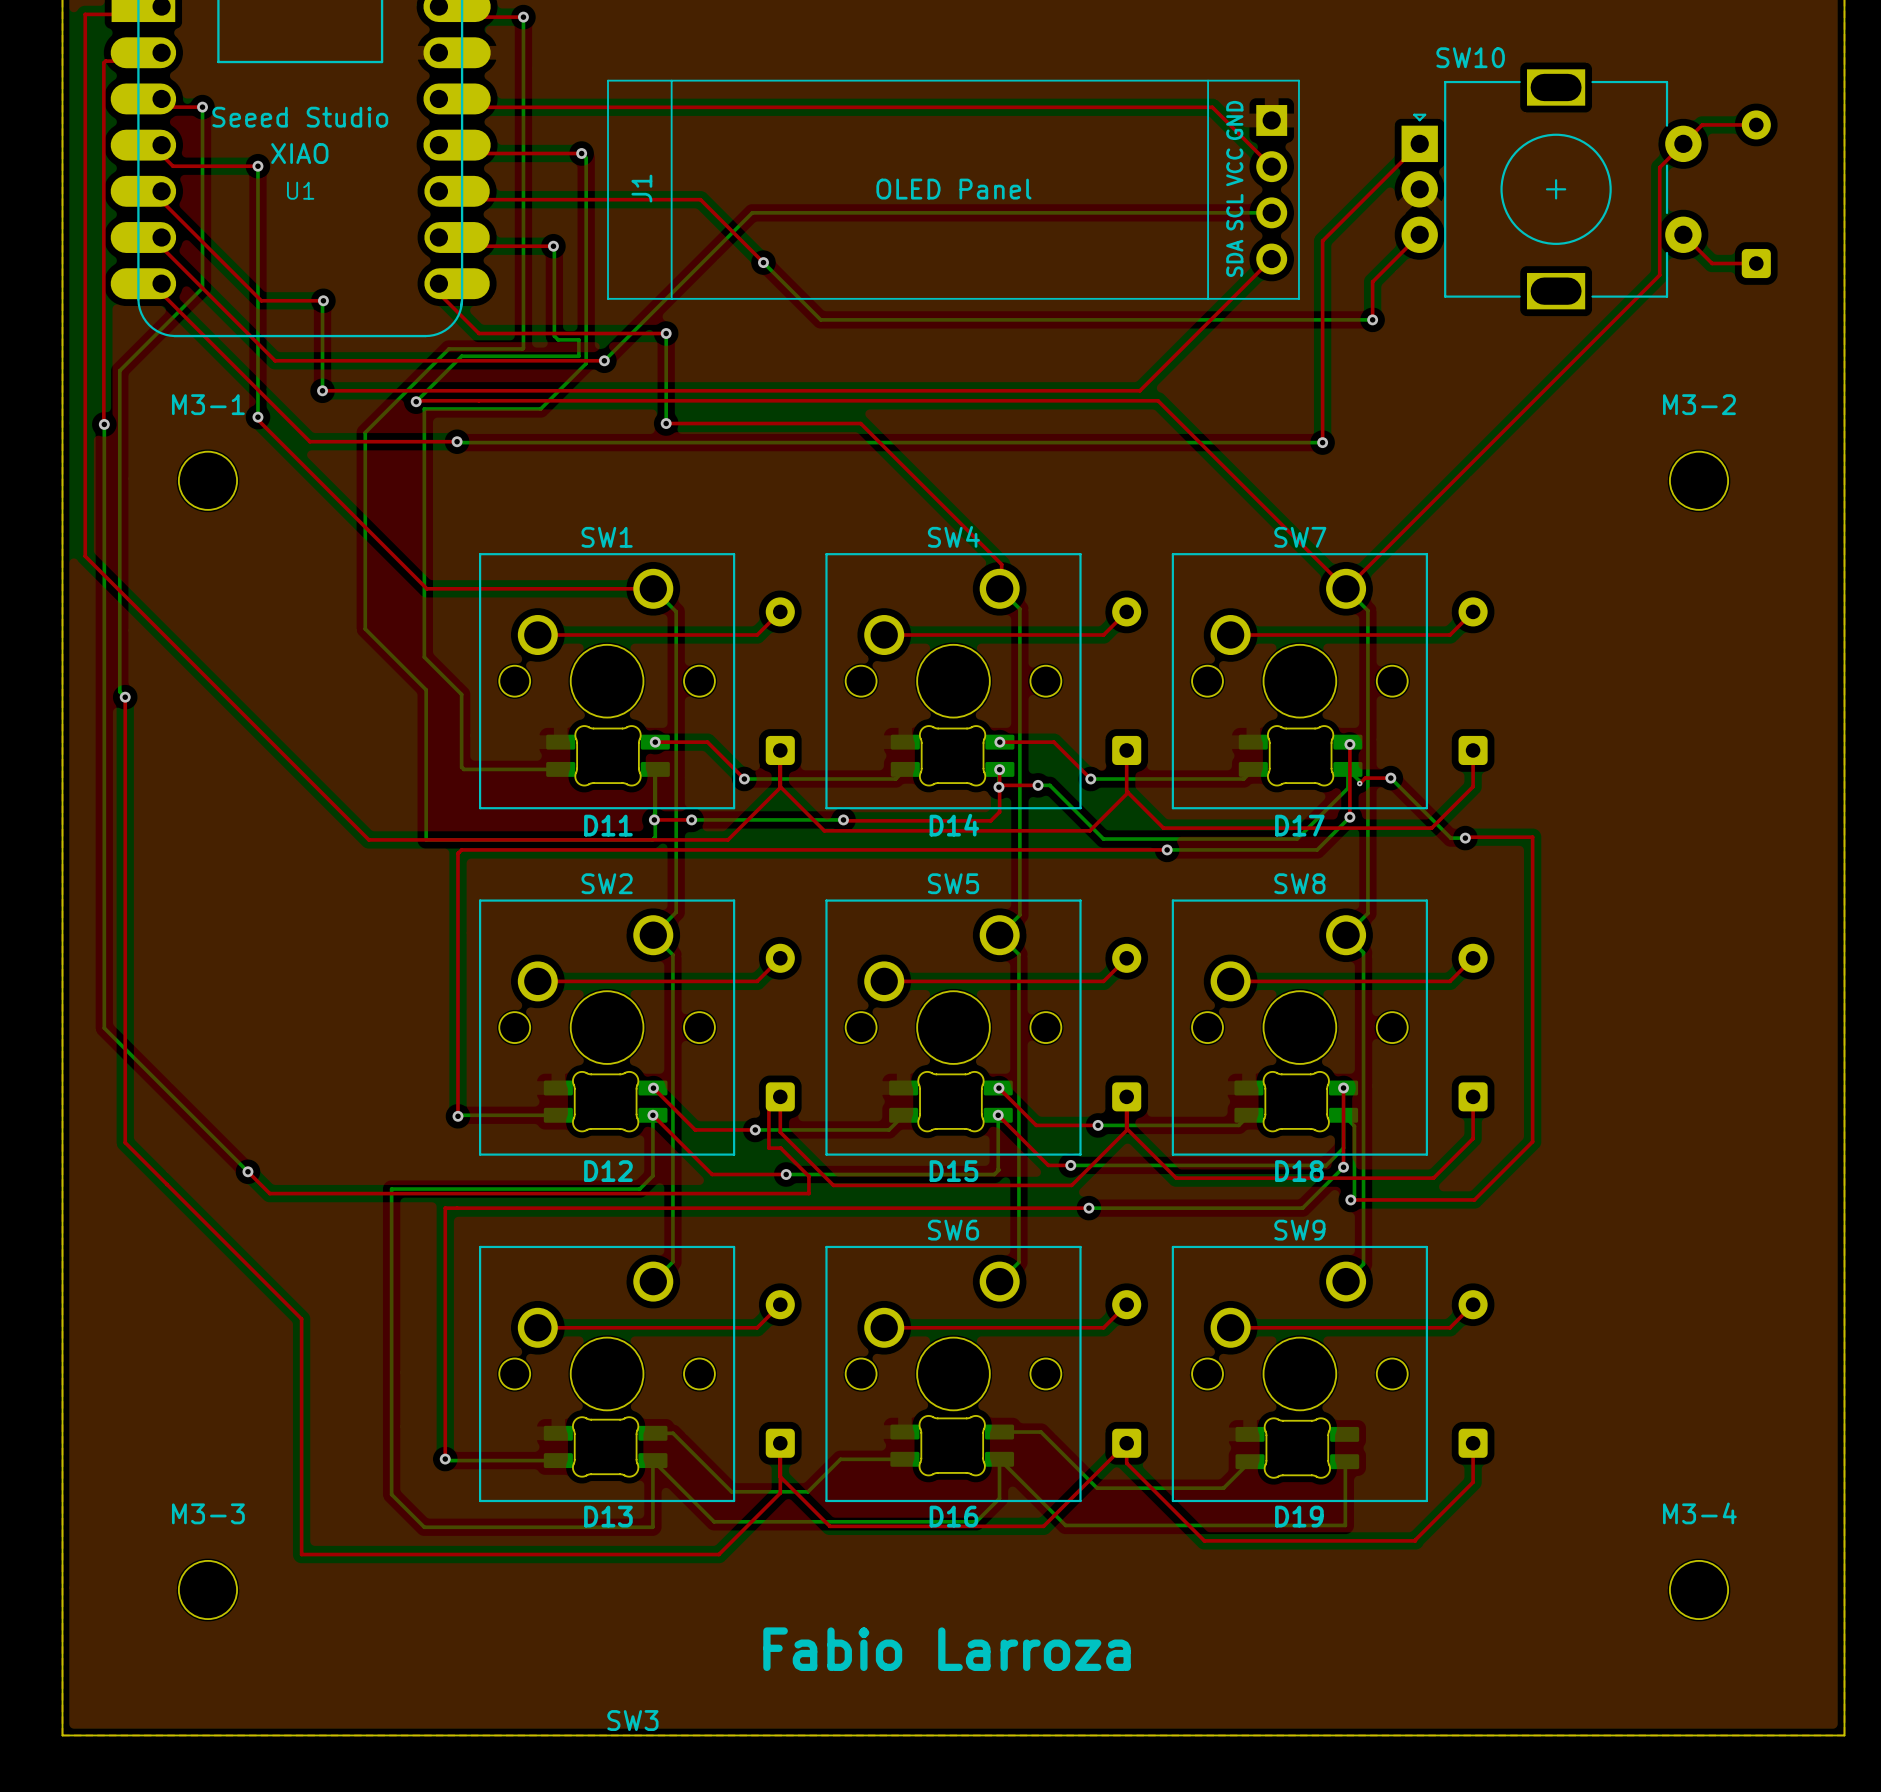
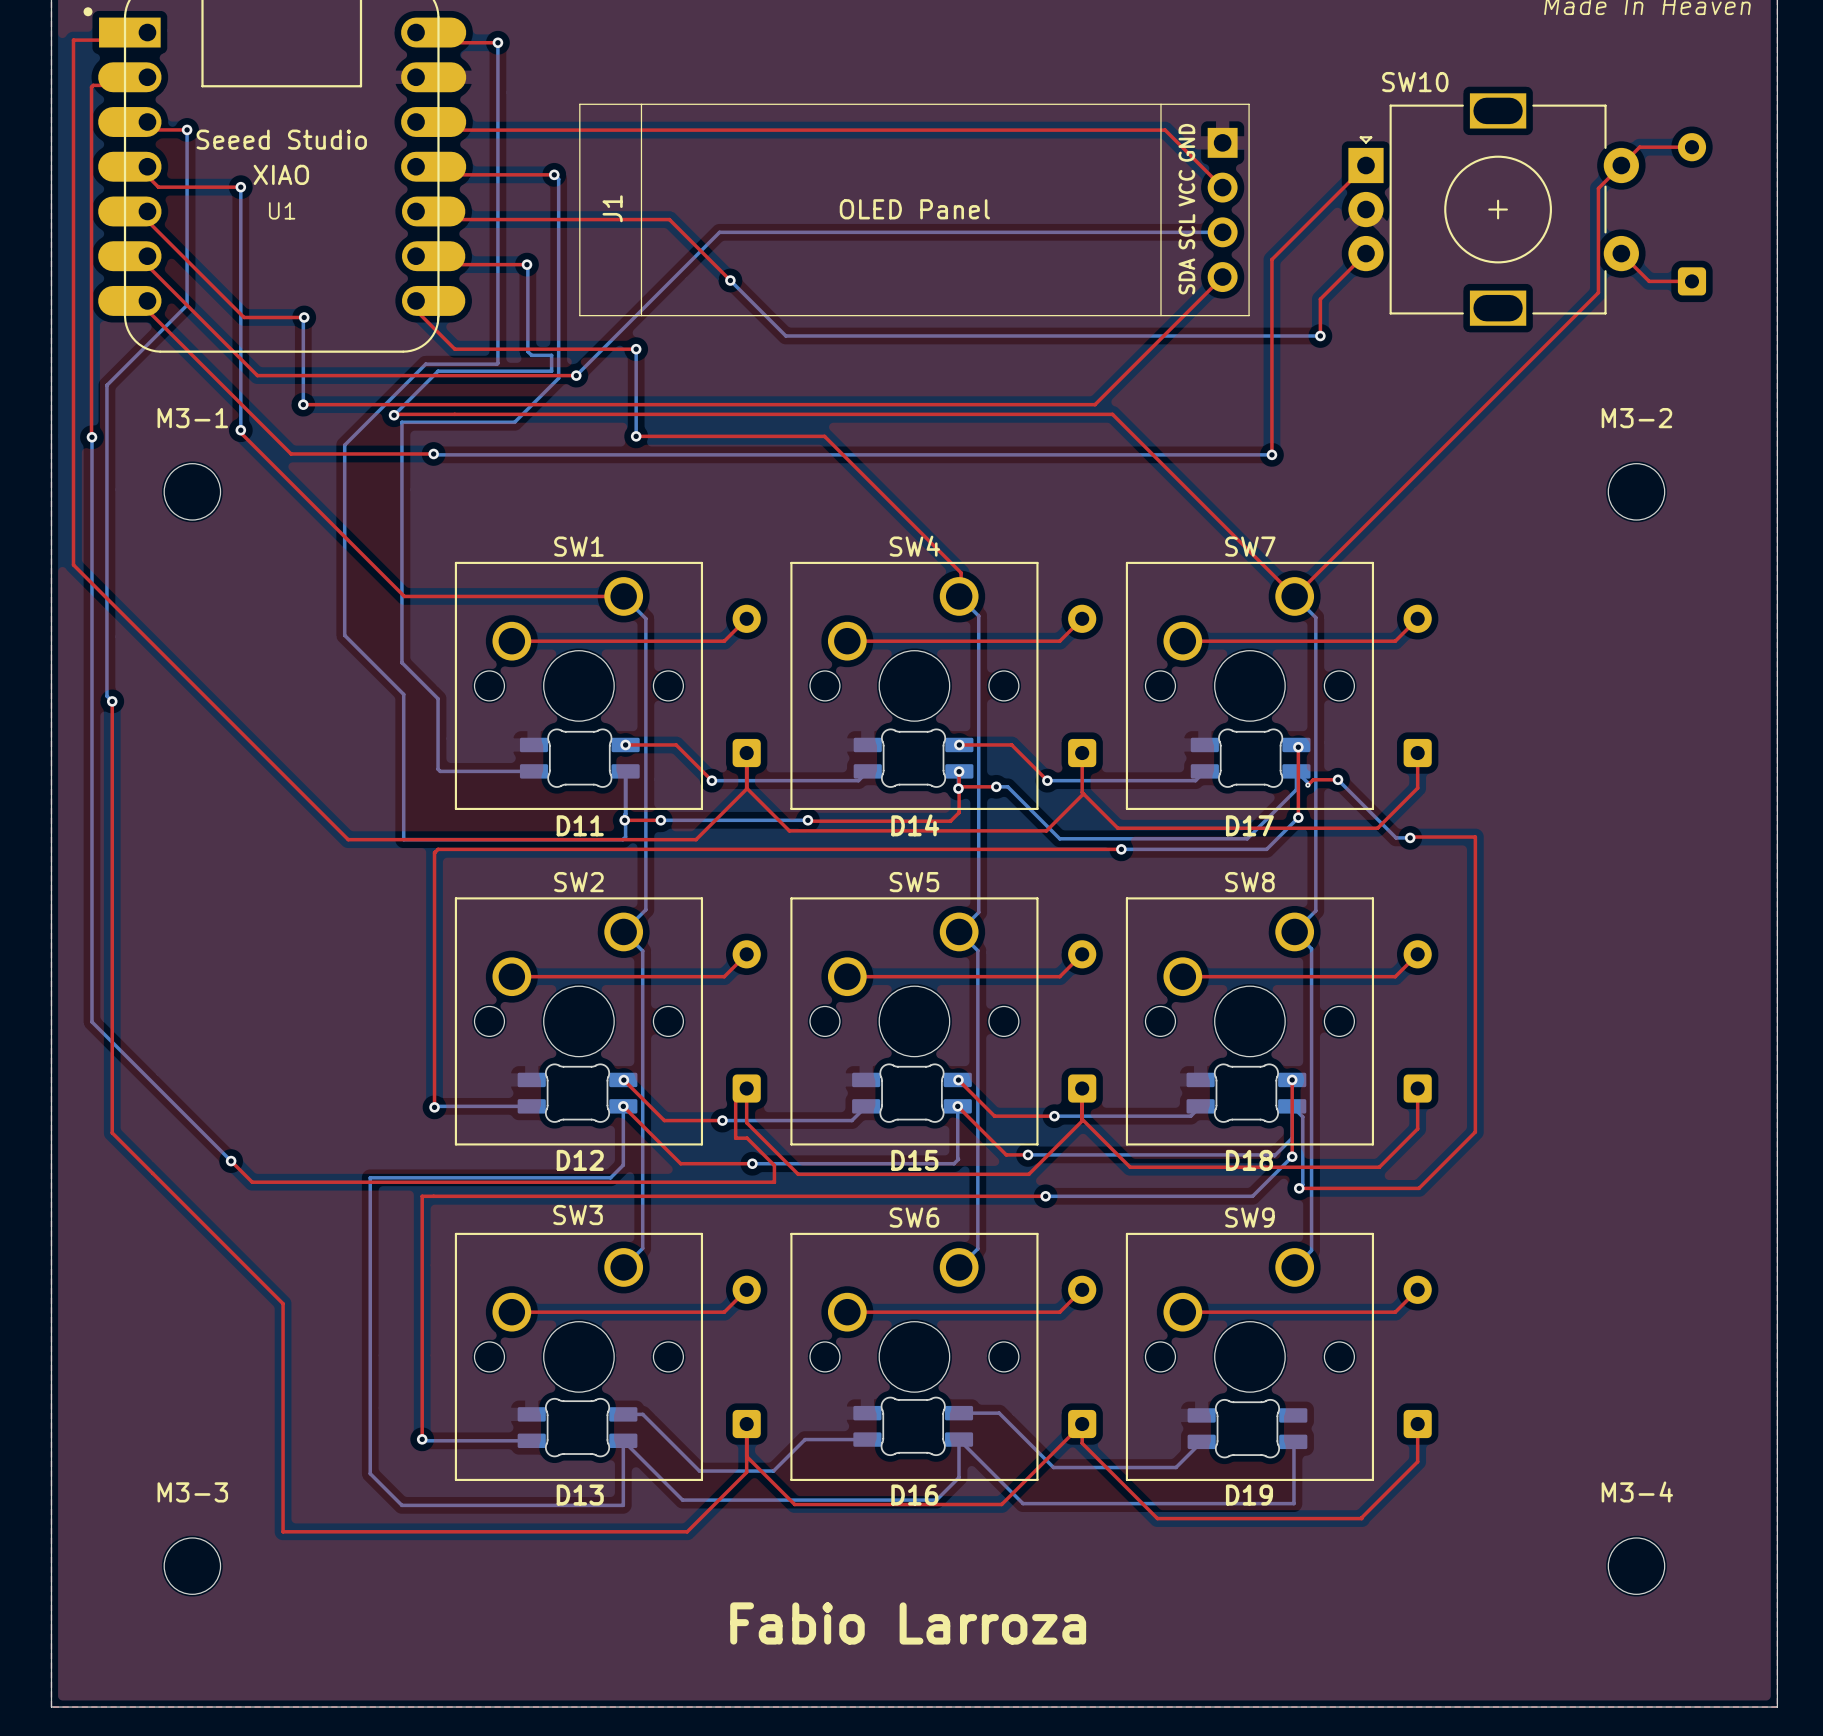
SW3 name position: SW3 (632, 1720) -> SW3 (578, 1215)

